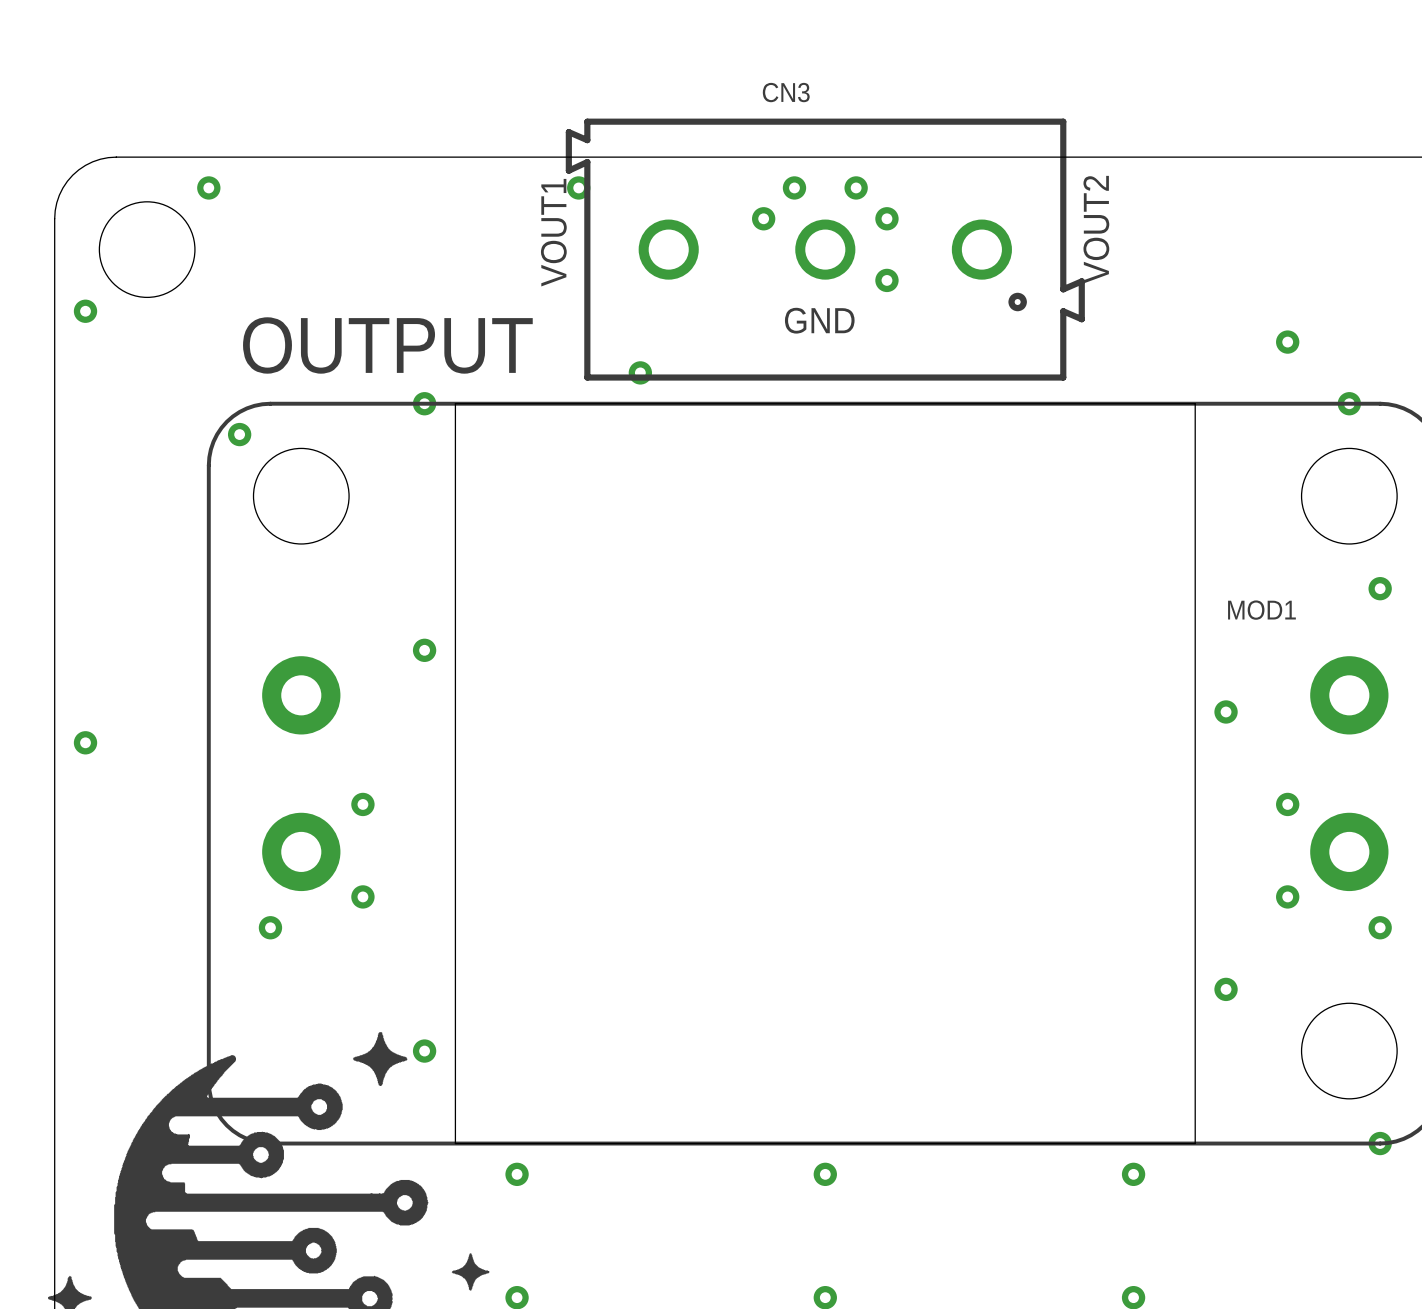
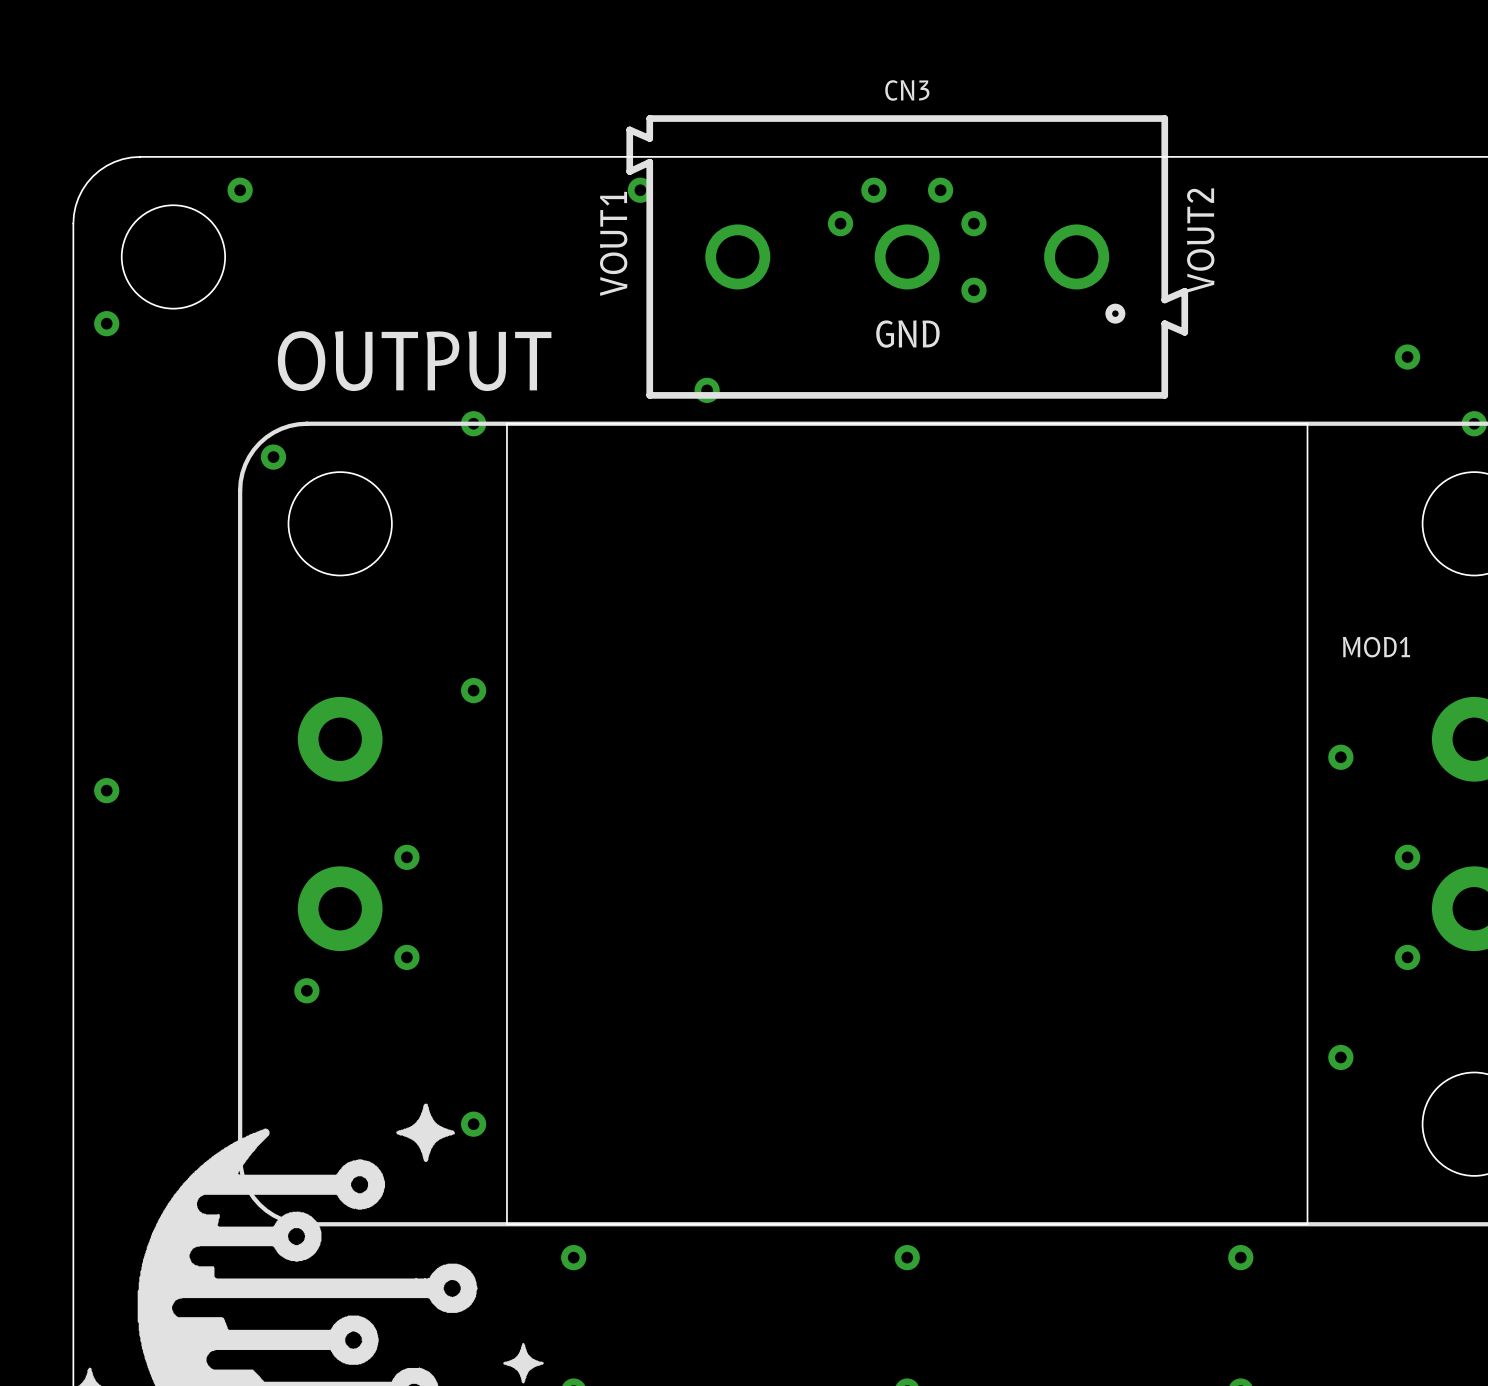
CN3 name position: CN3 (786, 92) -> CN3 (907, 90)

